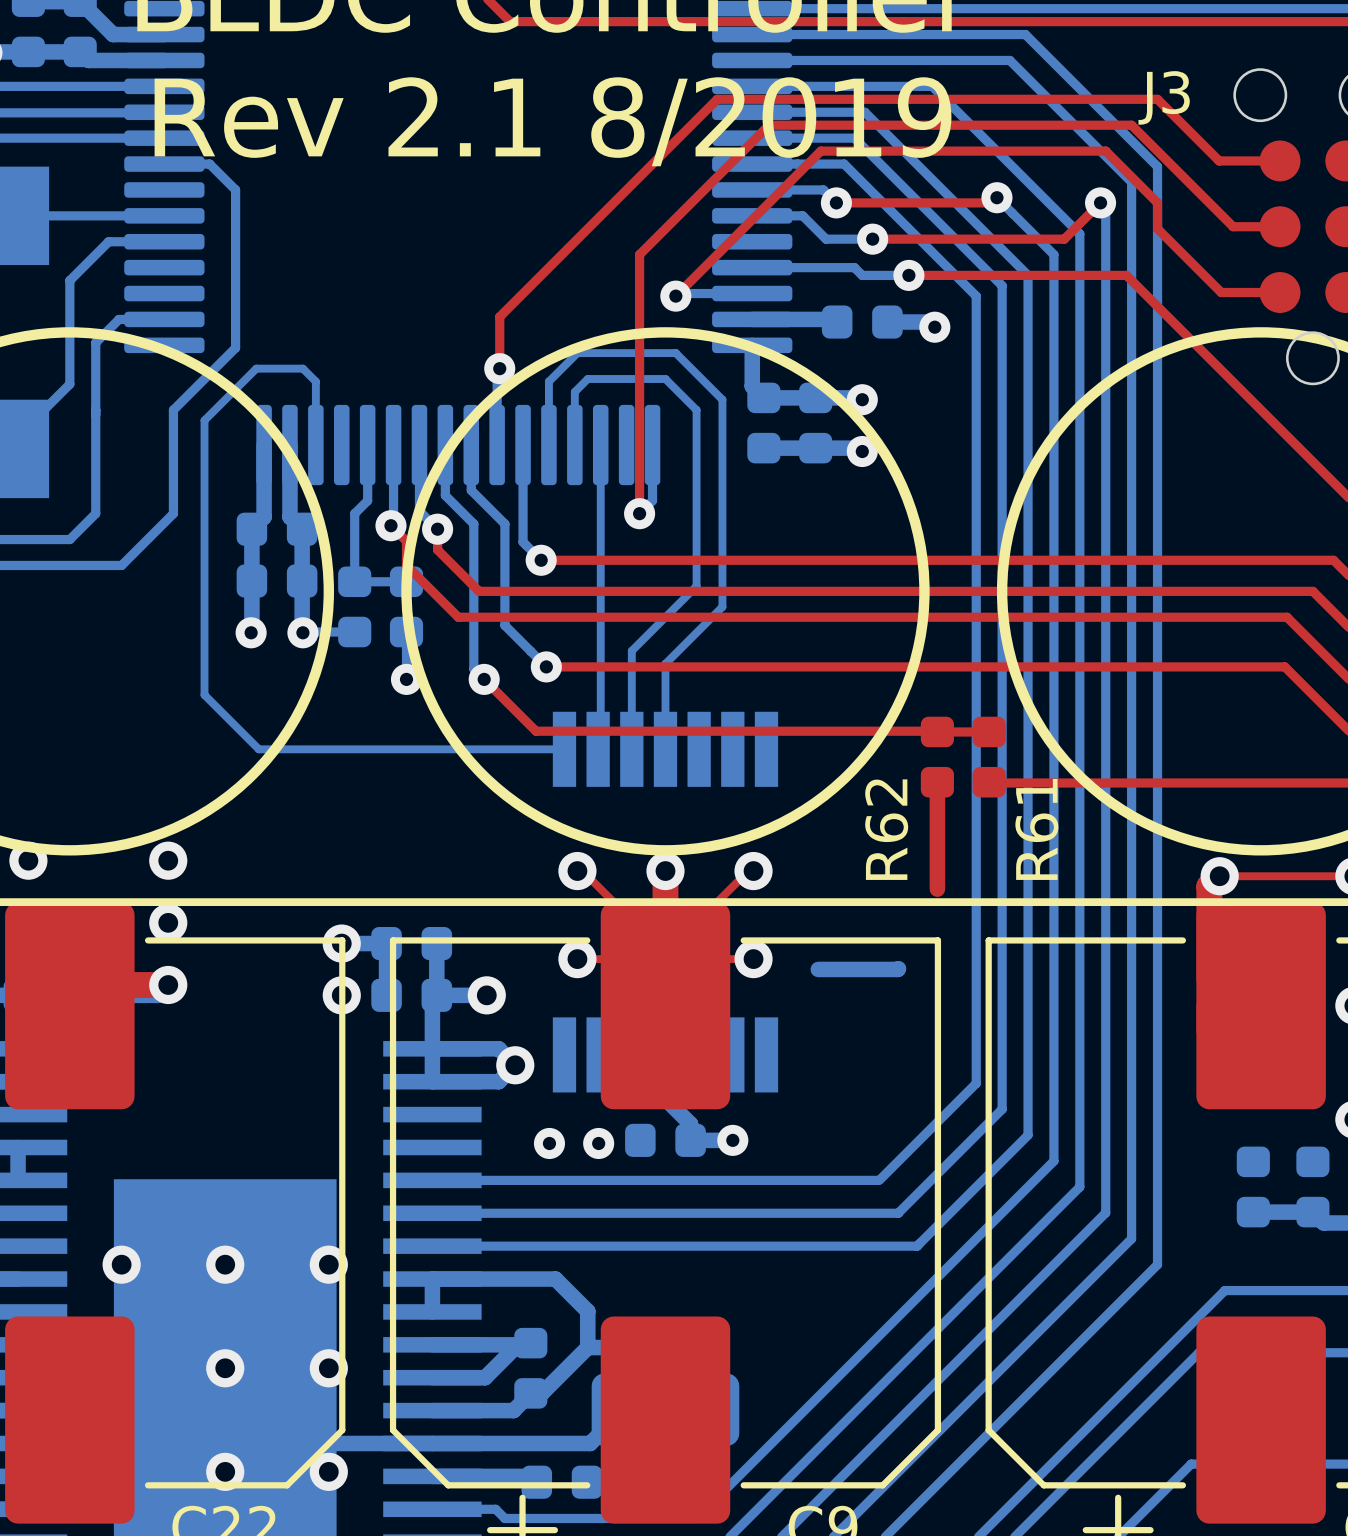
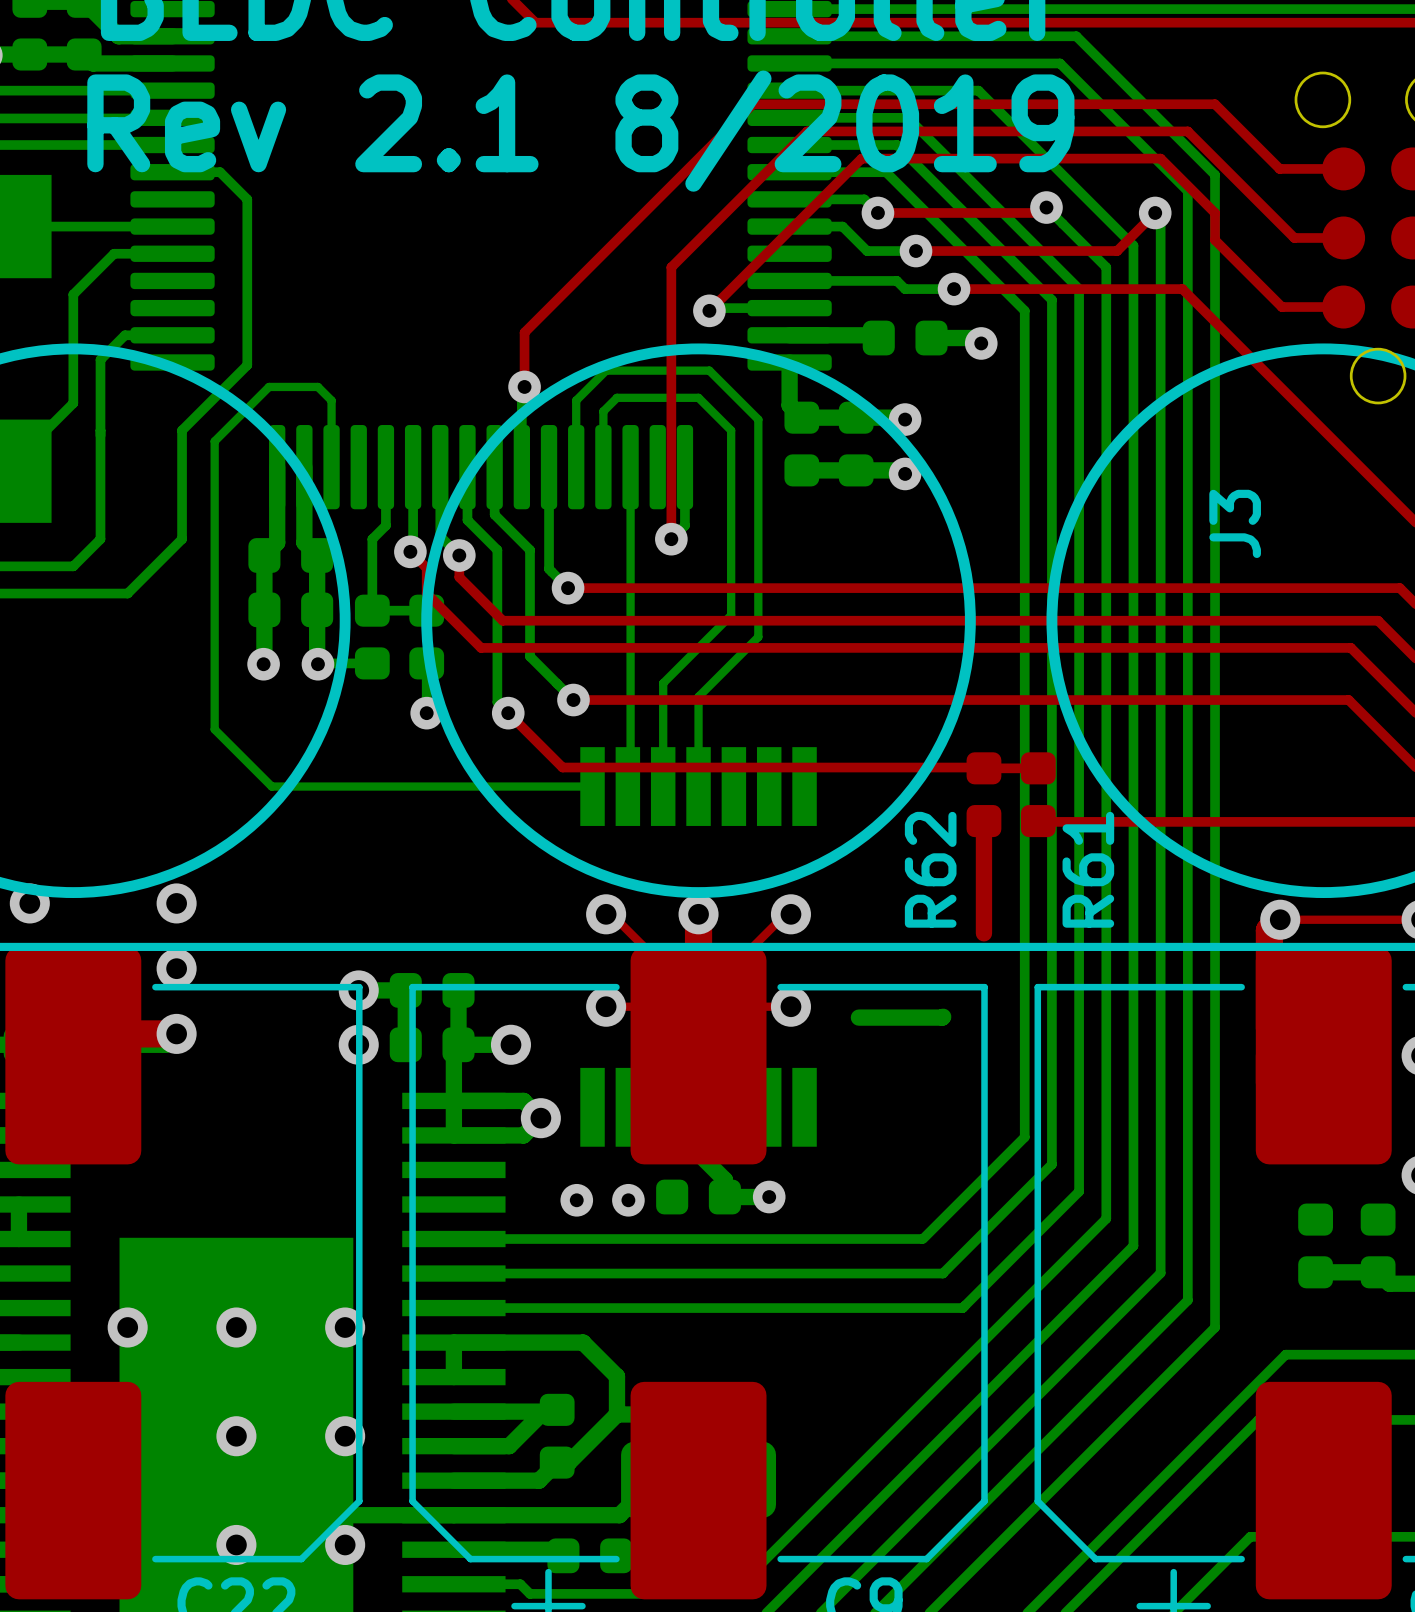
J3 name rotation: 0° (1164, 97) -> 90° counterclockwise (1235, 523)
J3 name position: J3 (1164, 97) -> J3 (1235, 523)

